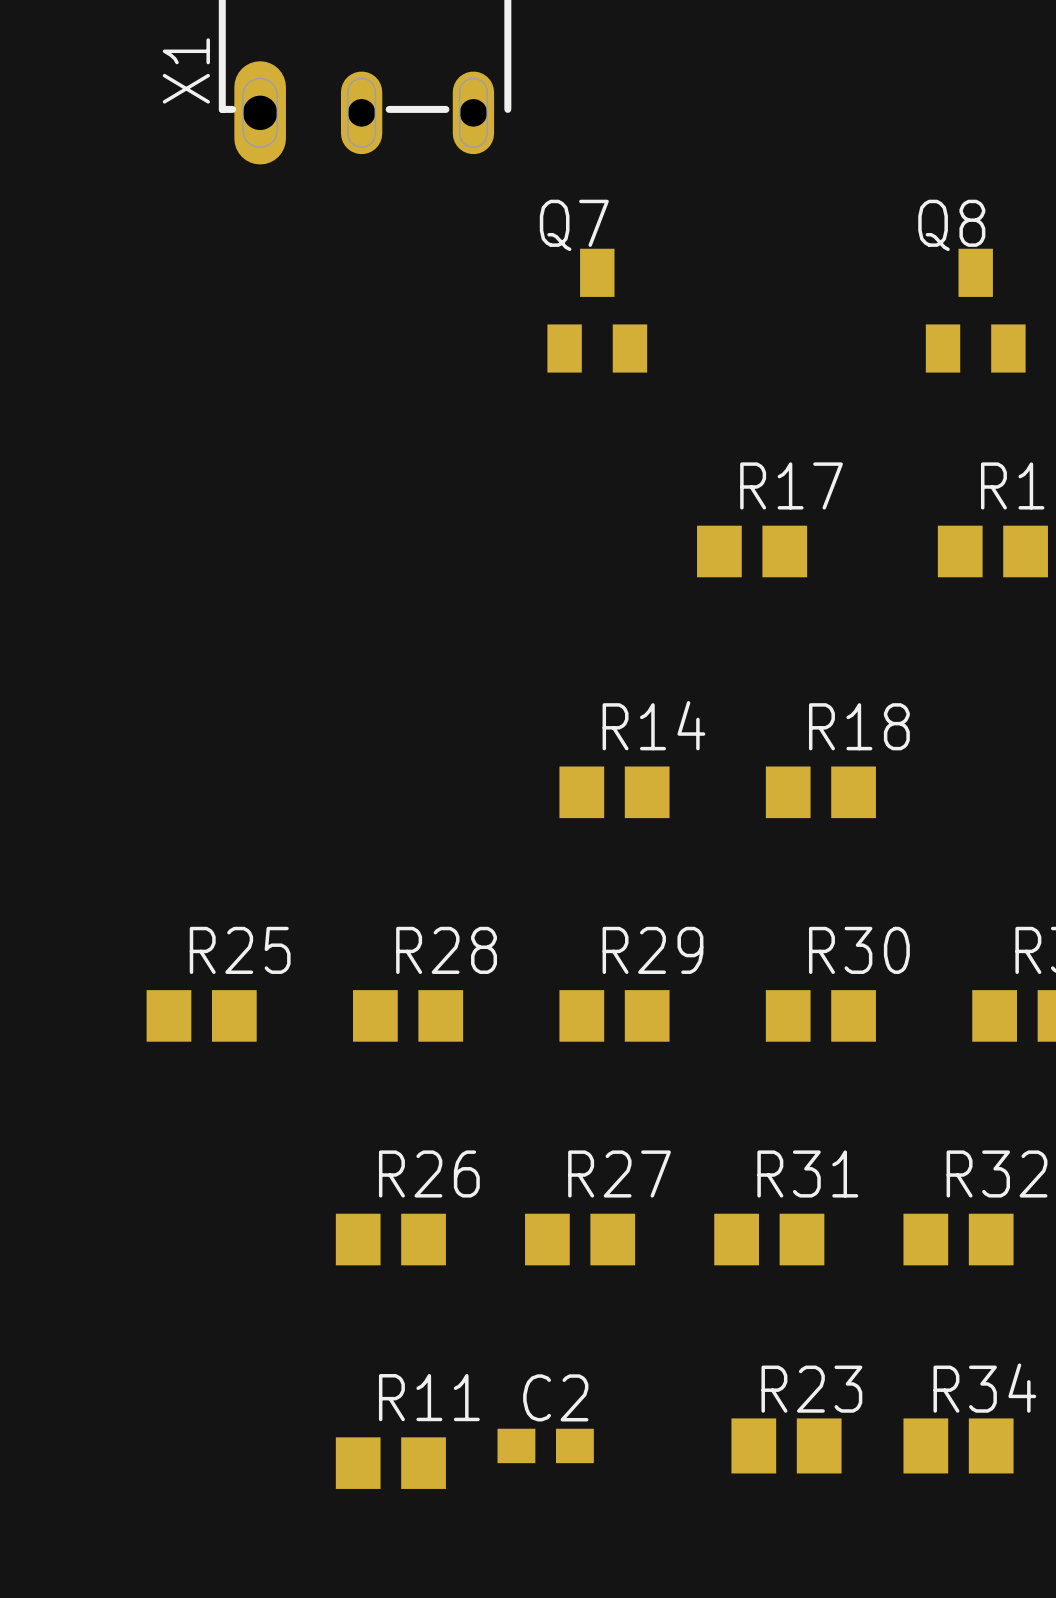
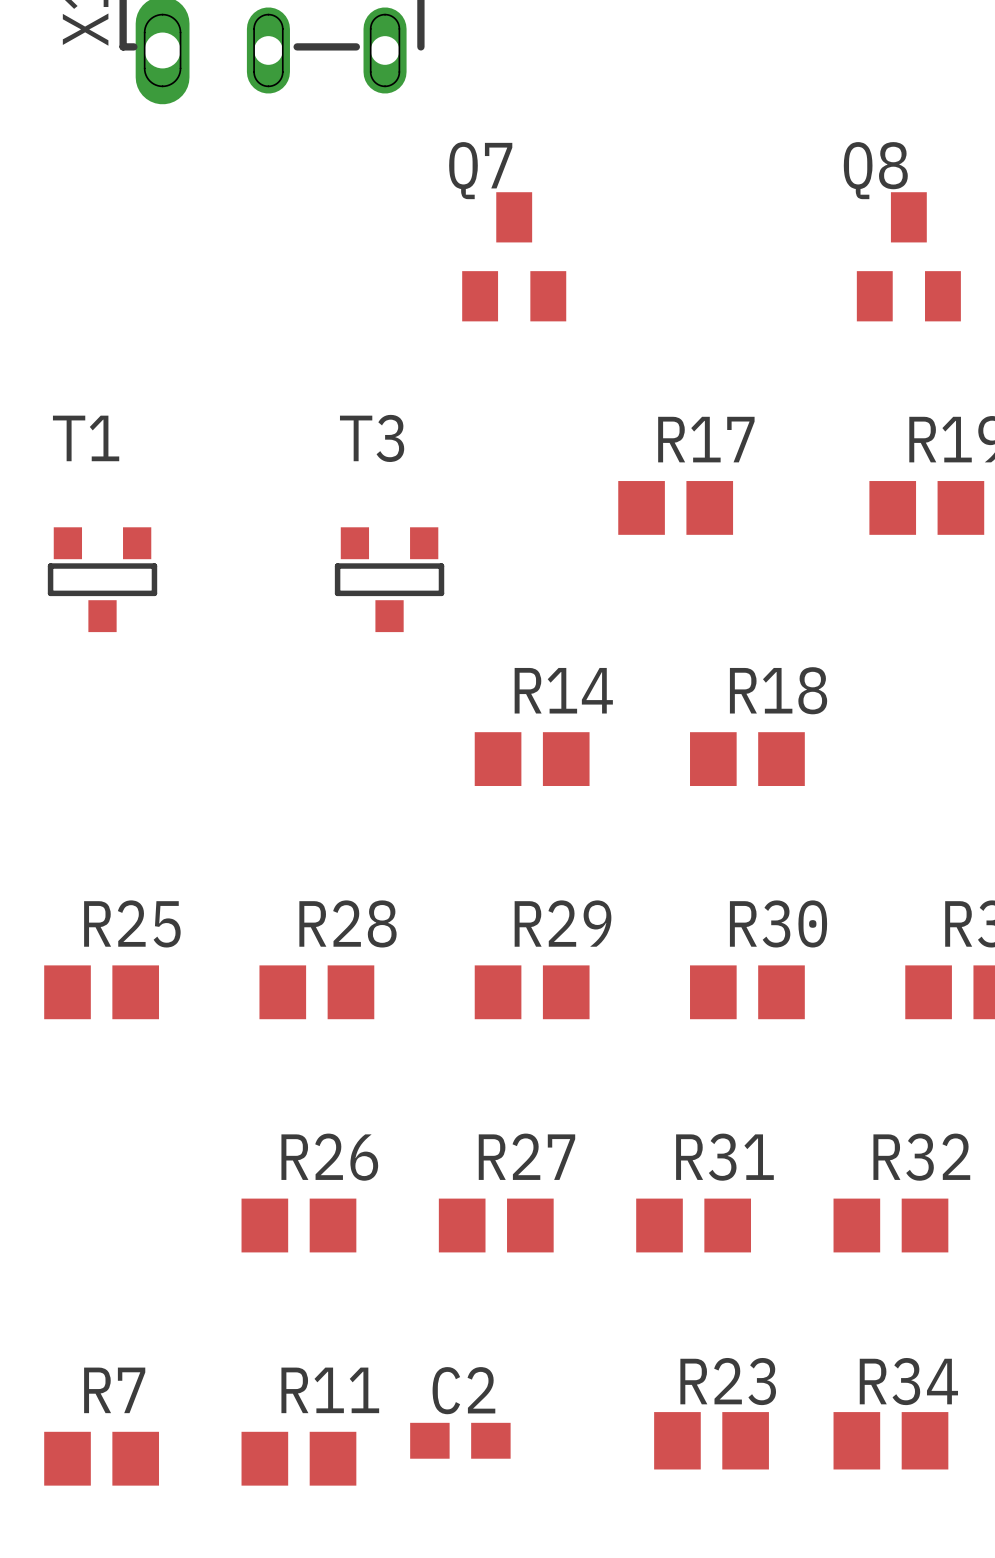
T1: none -> (102, 579)
T3: none -> (389, 579)
R7: none -> (101, 1458)

